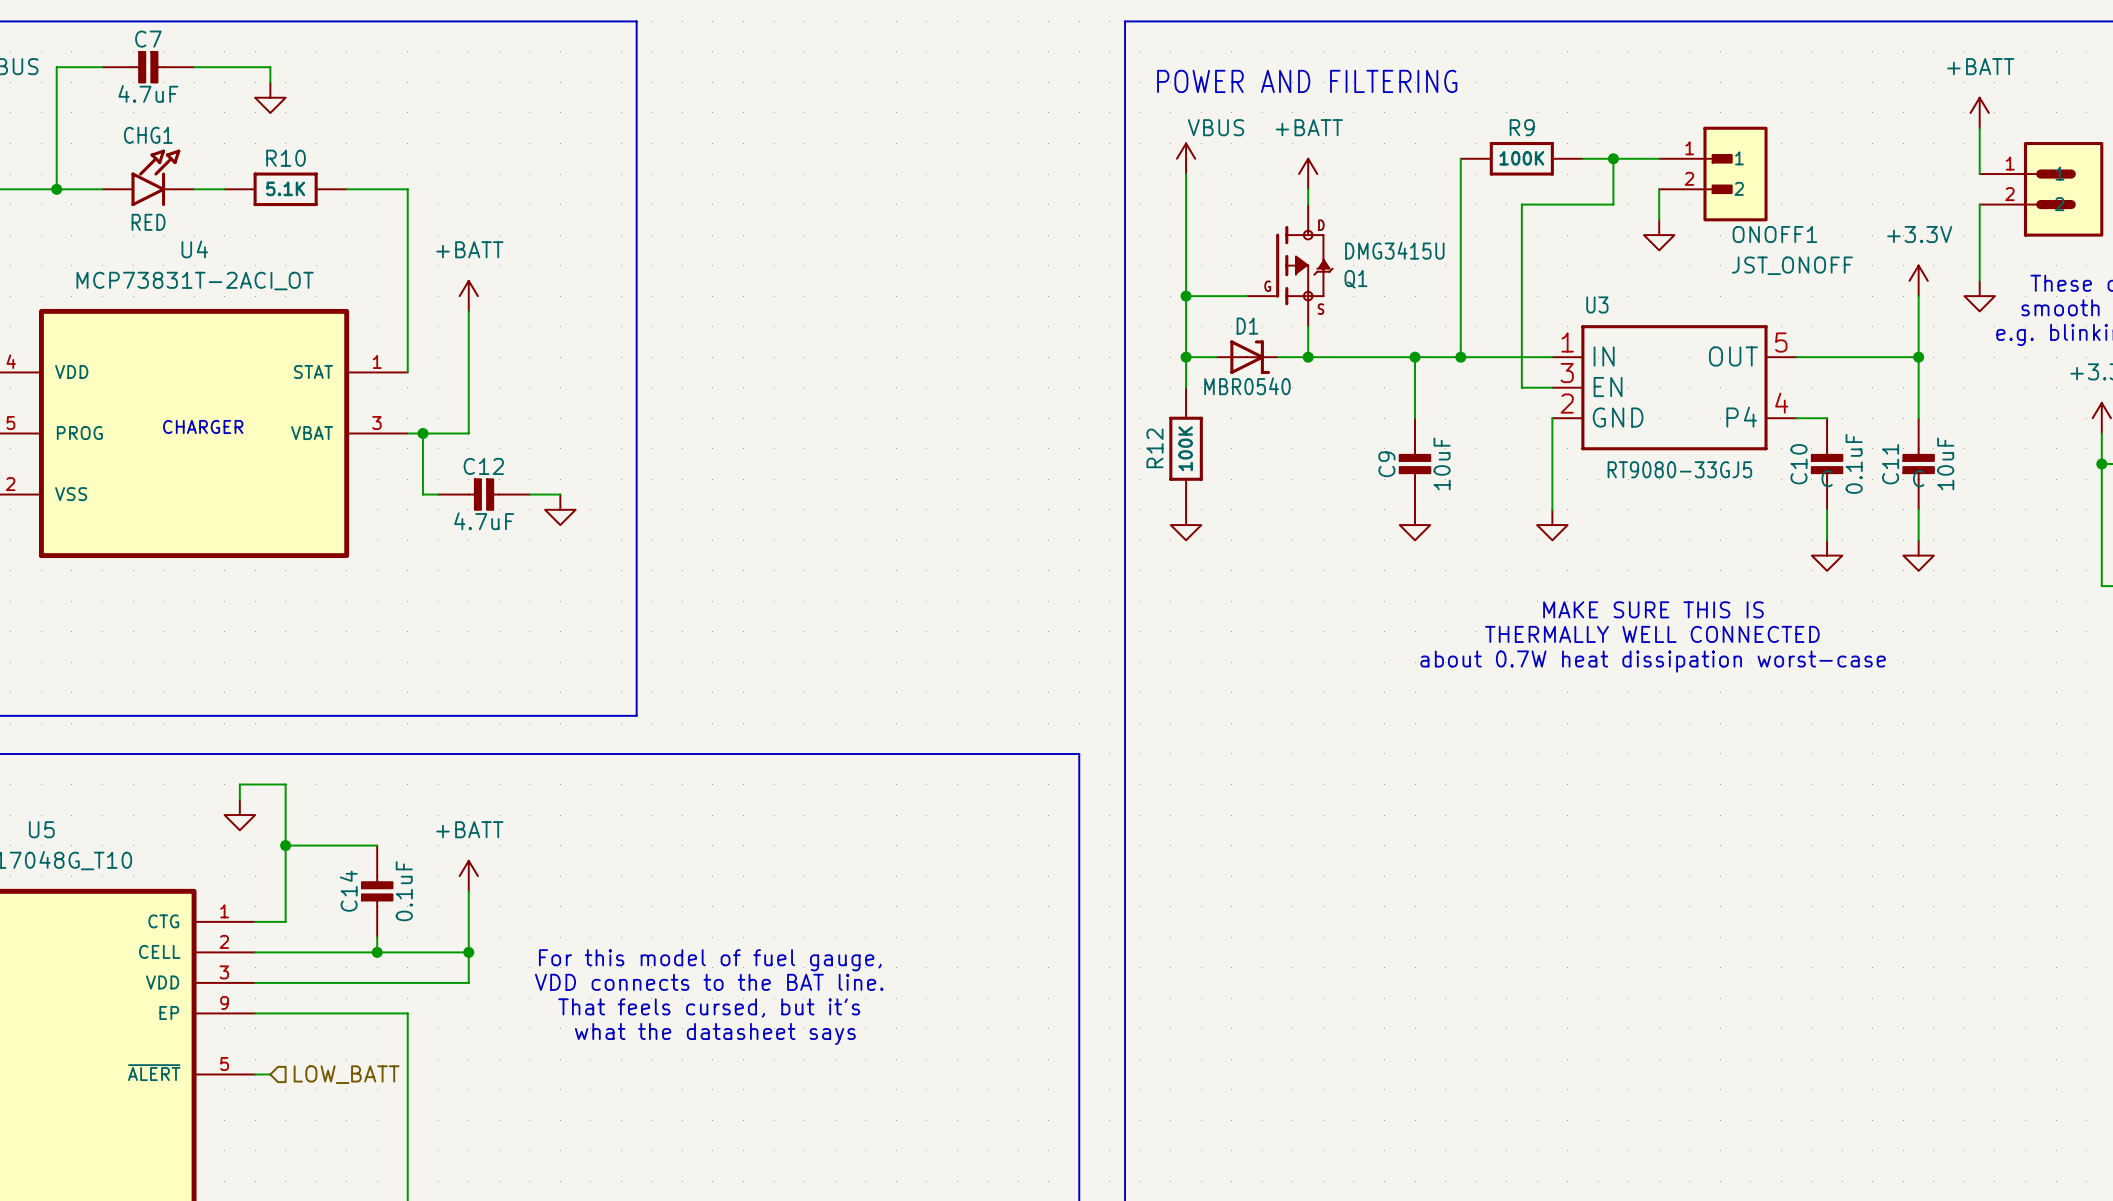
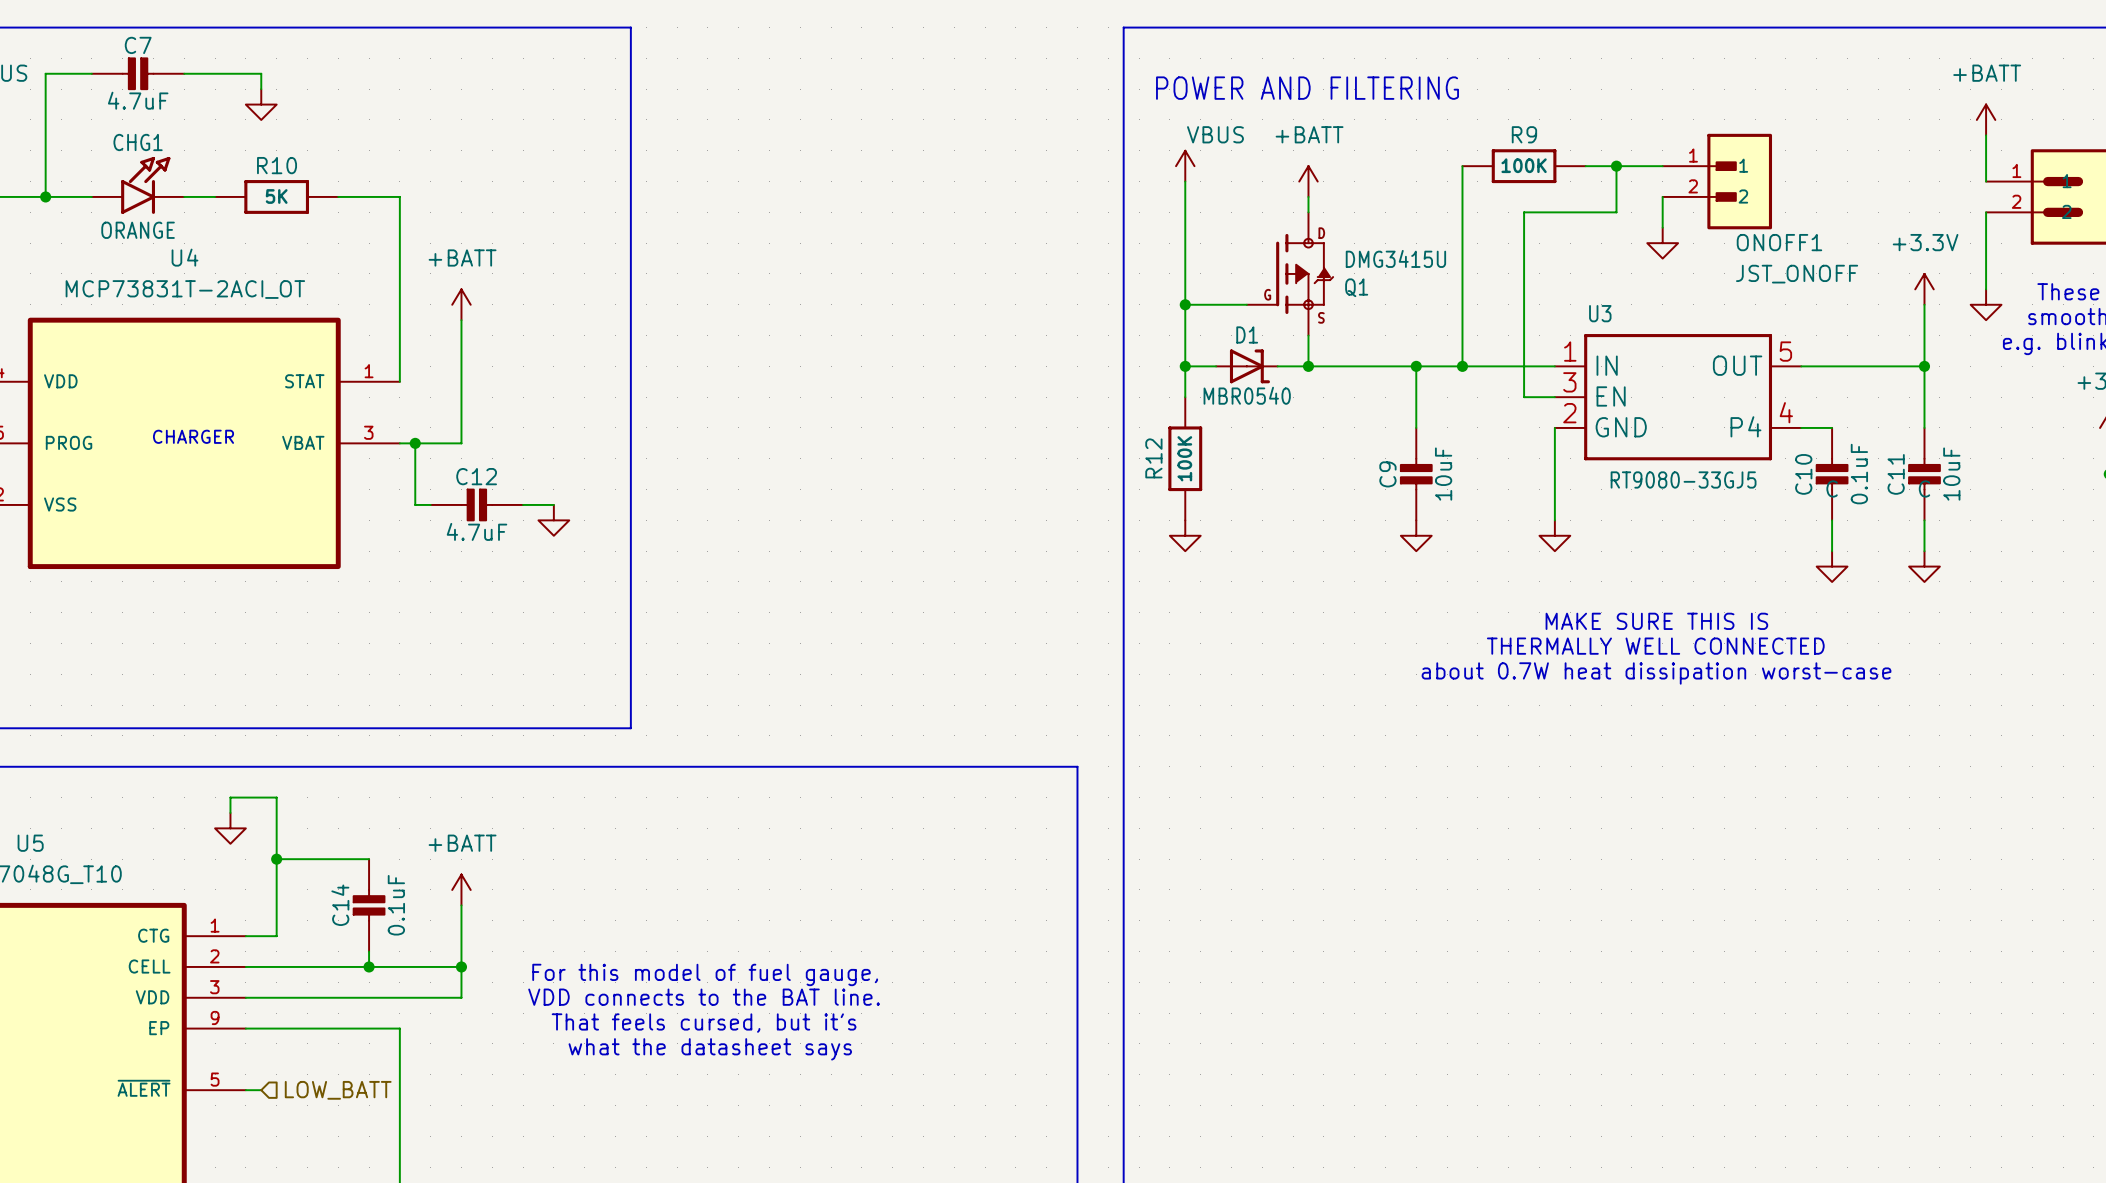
R10 value: 5.1K (285, 188) -> 5K (276, 196)
CHG1 value: RED (148, 222) -> ORANGE (138, 230)

